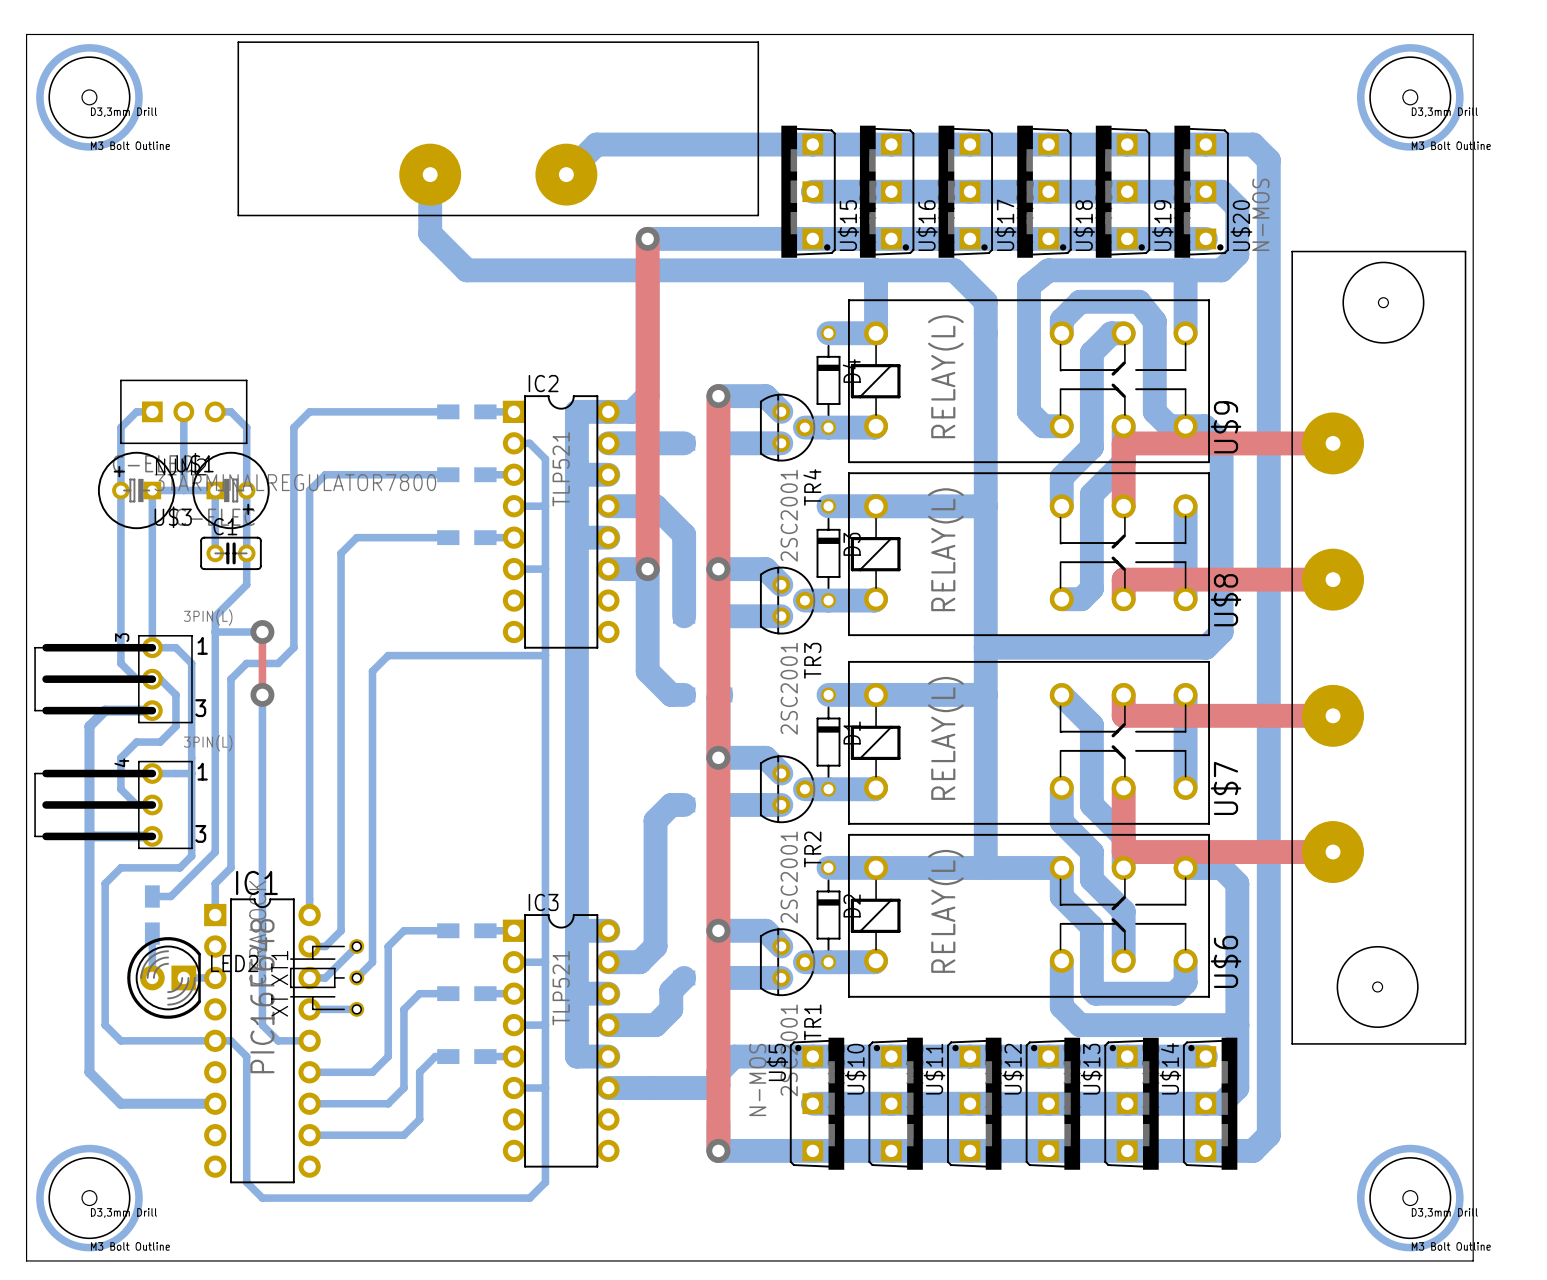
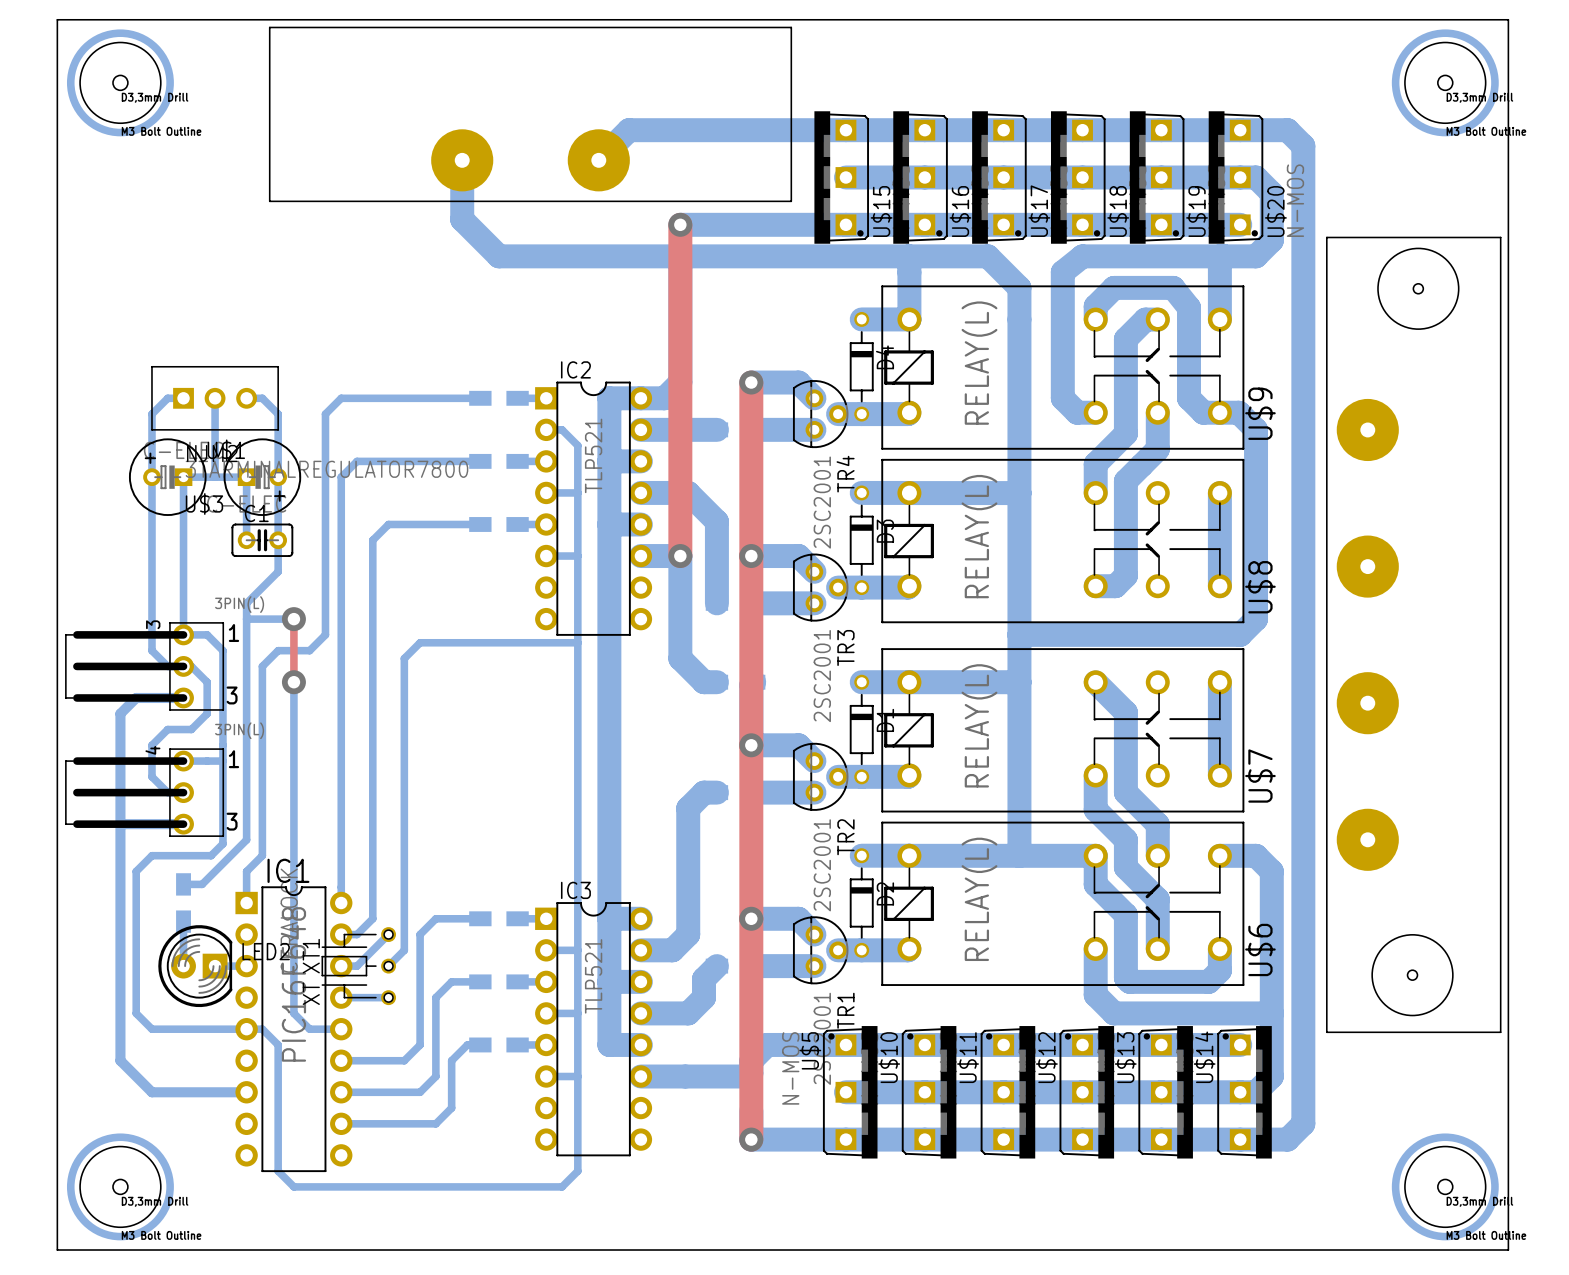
top track: (1333, 443) (1123, 443) (1123, 506) -> none
top track: (1333, 579) (1123, 579) (1123, 599) -> none
top track: (1123, 695) (1123, 715) (1333, 715) -> none
top track: (1123, 787) (1123, 852) (1333, 852) -> none

